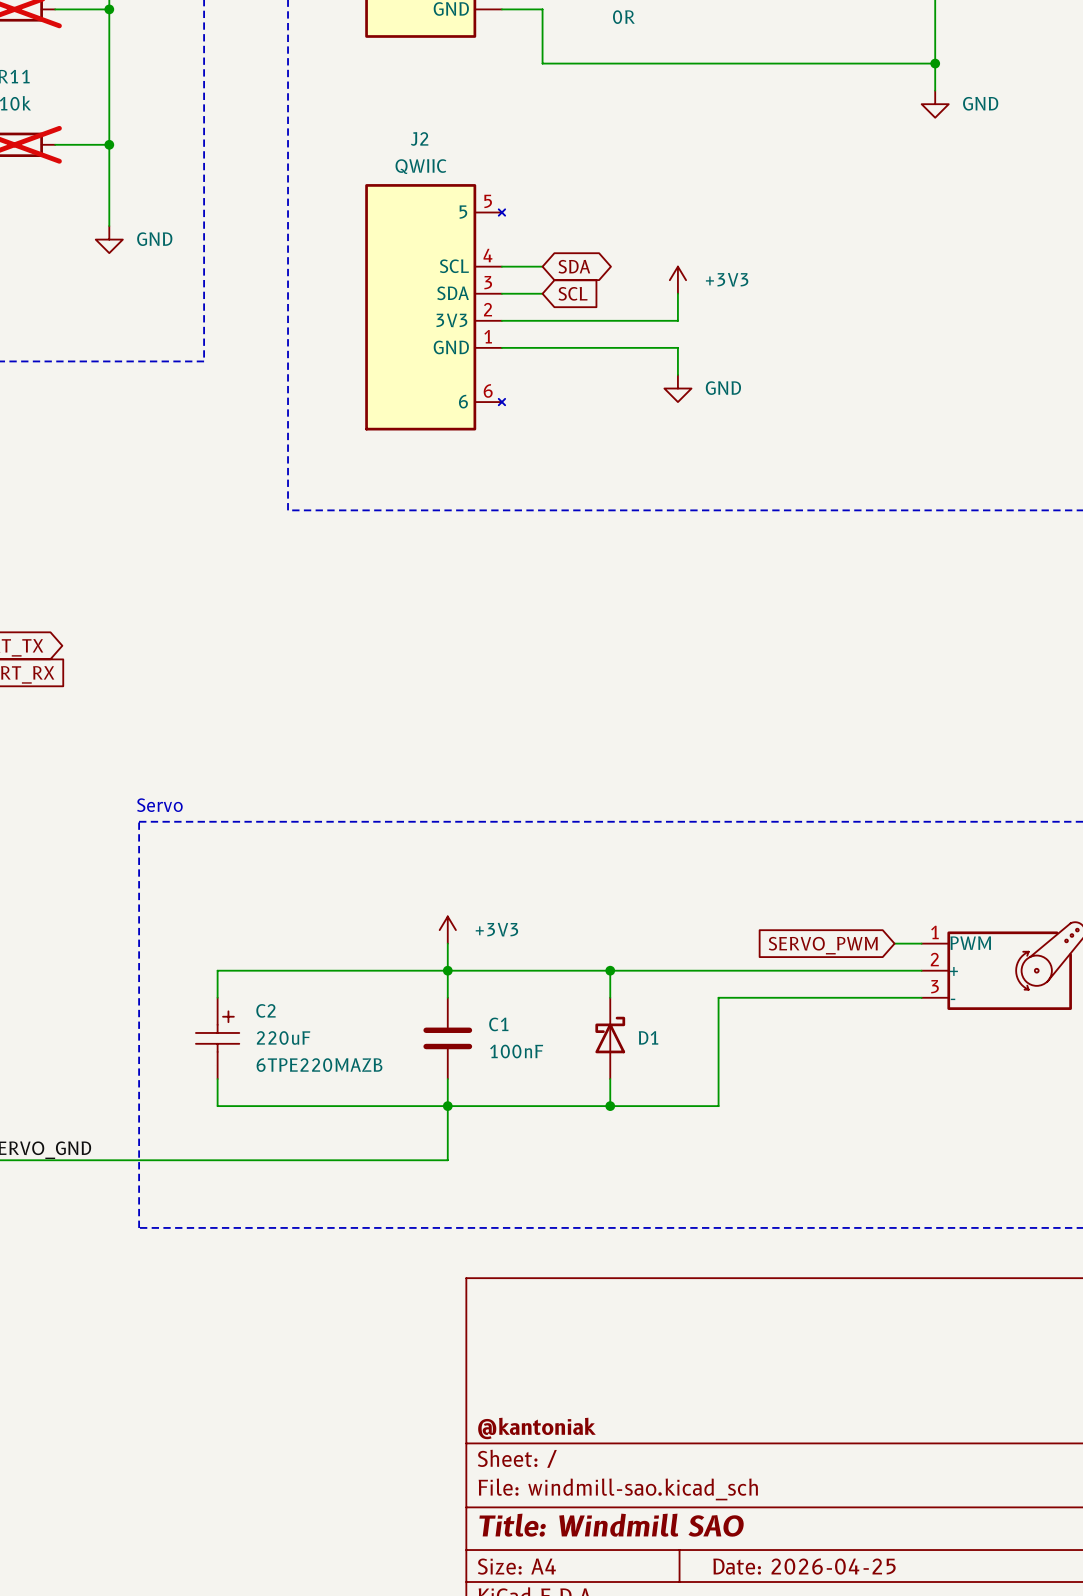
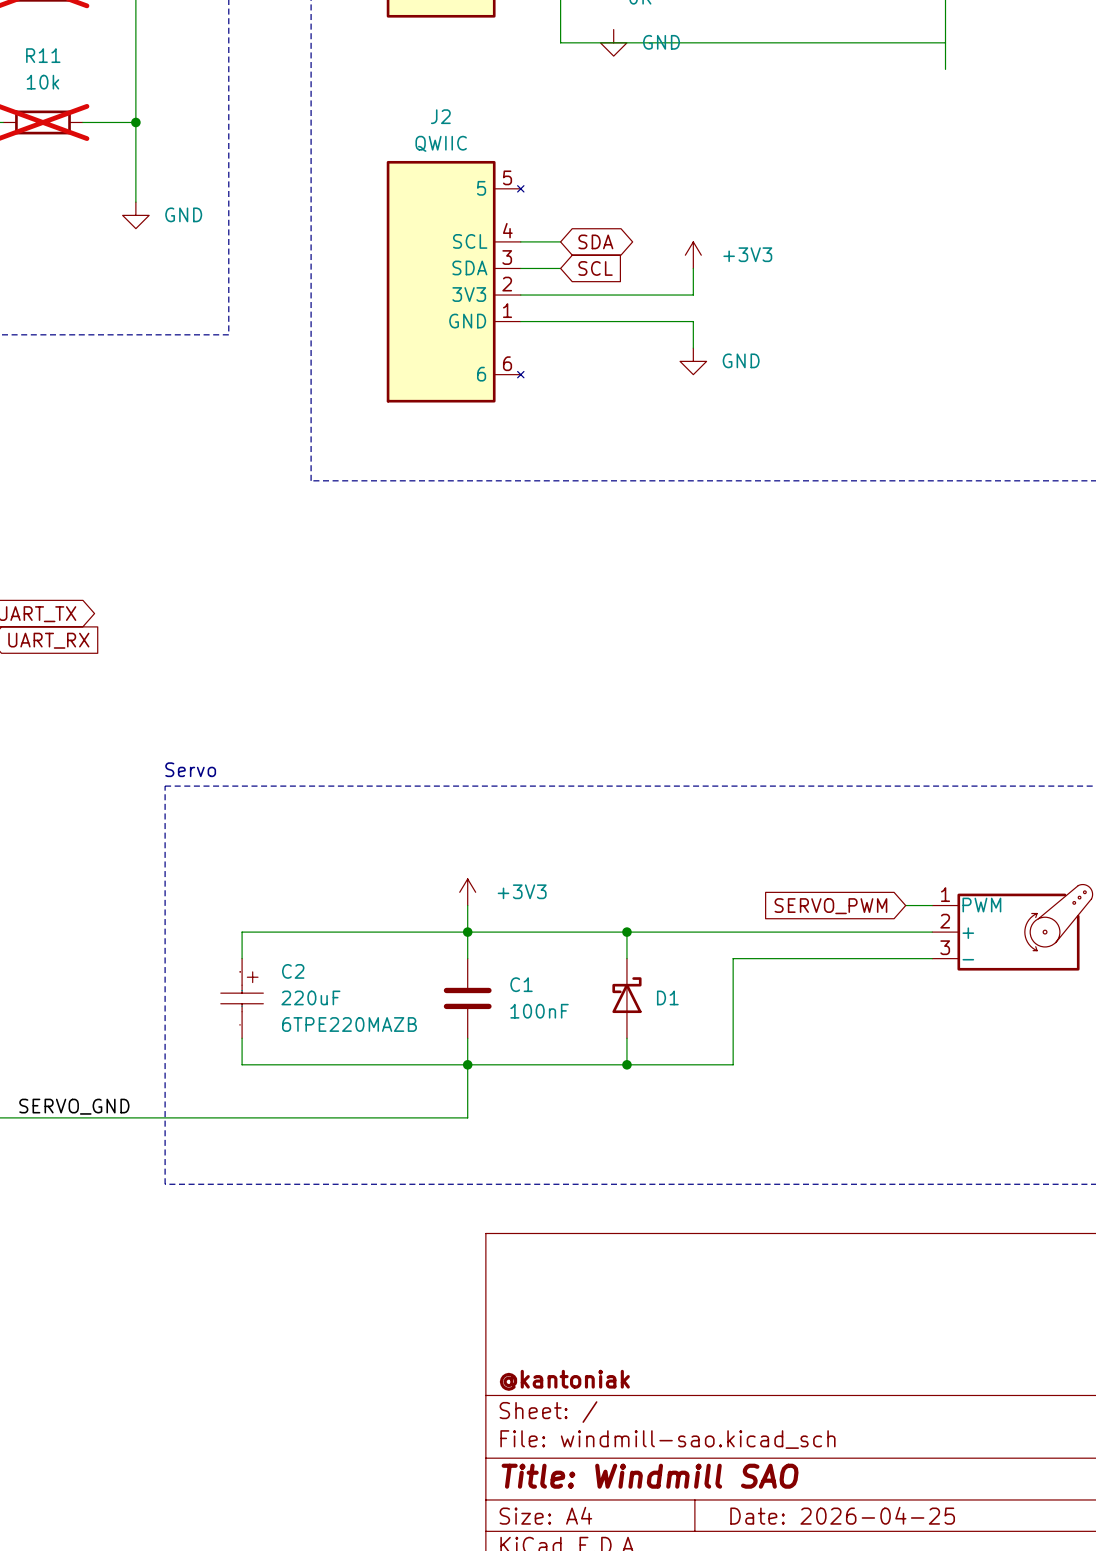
power symbol: none -> GND (613, 42)
junction: (935, 63) -> none
power symbol: GND (935, 104) -> none

